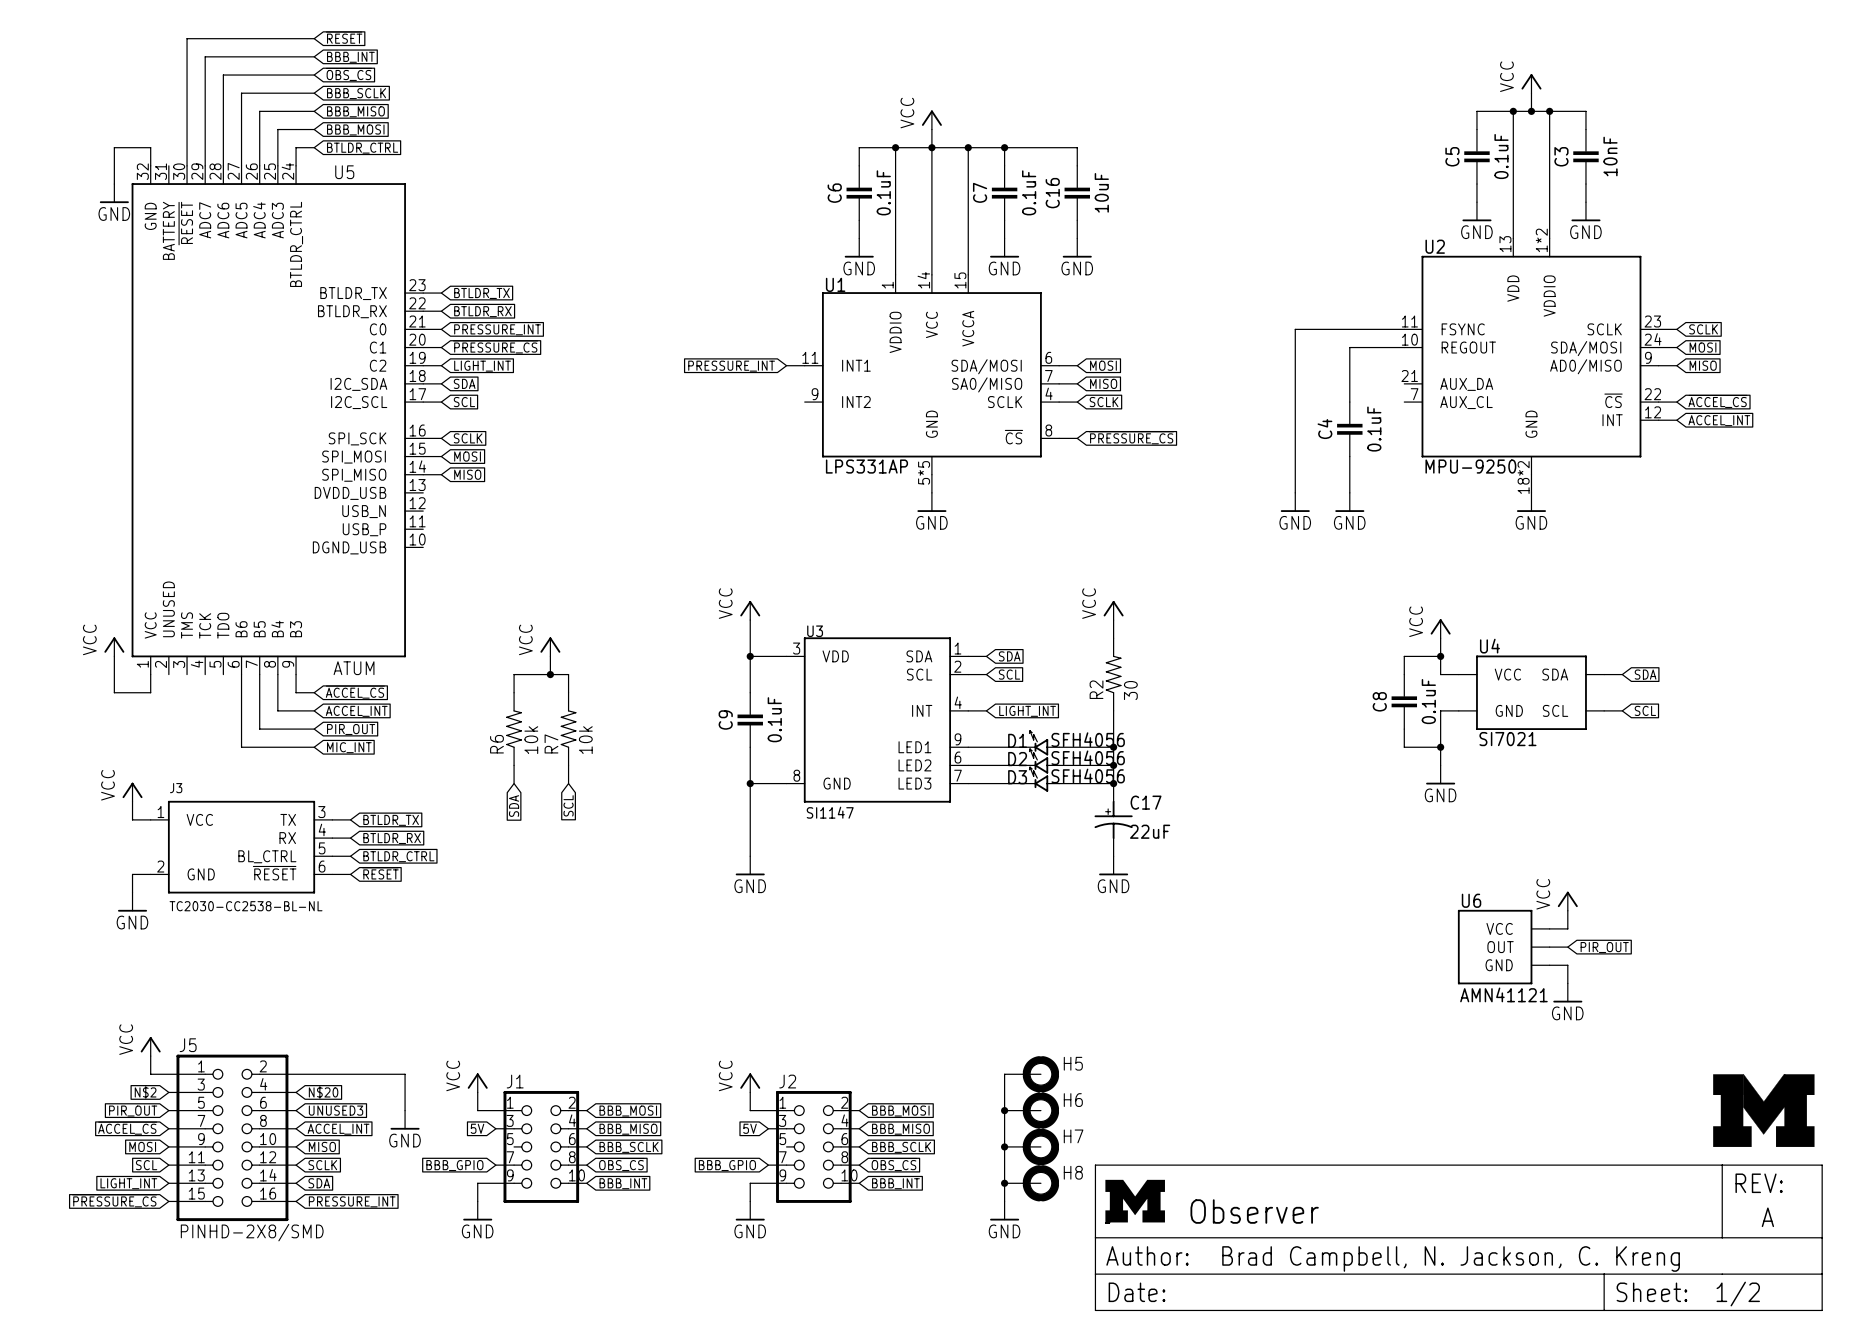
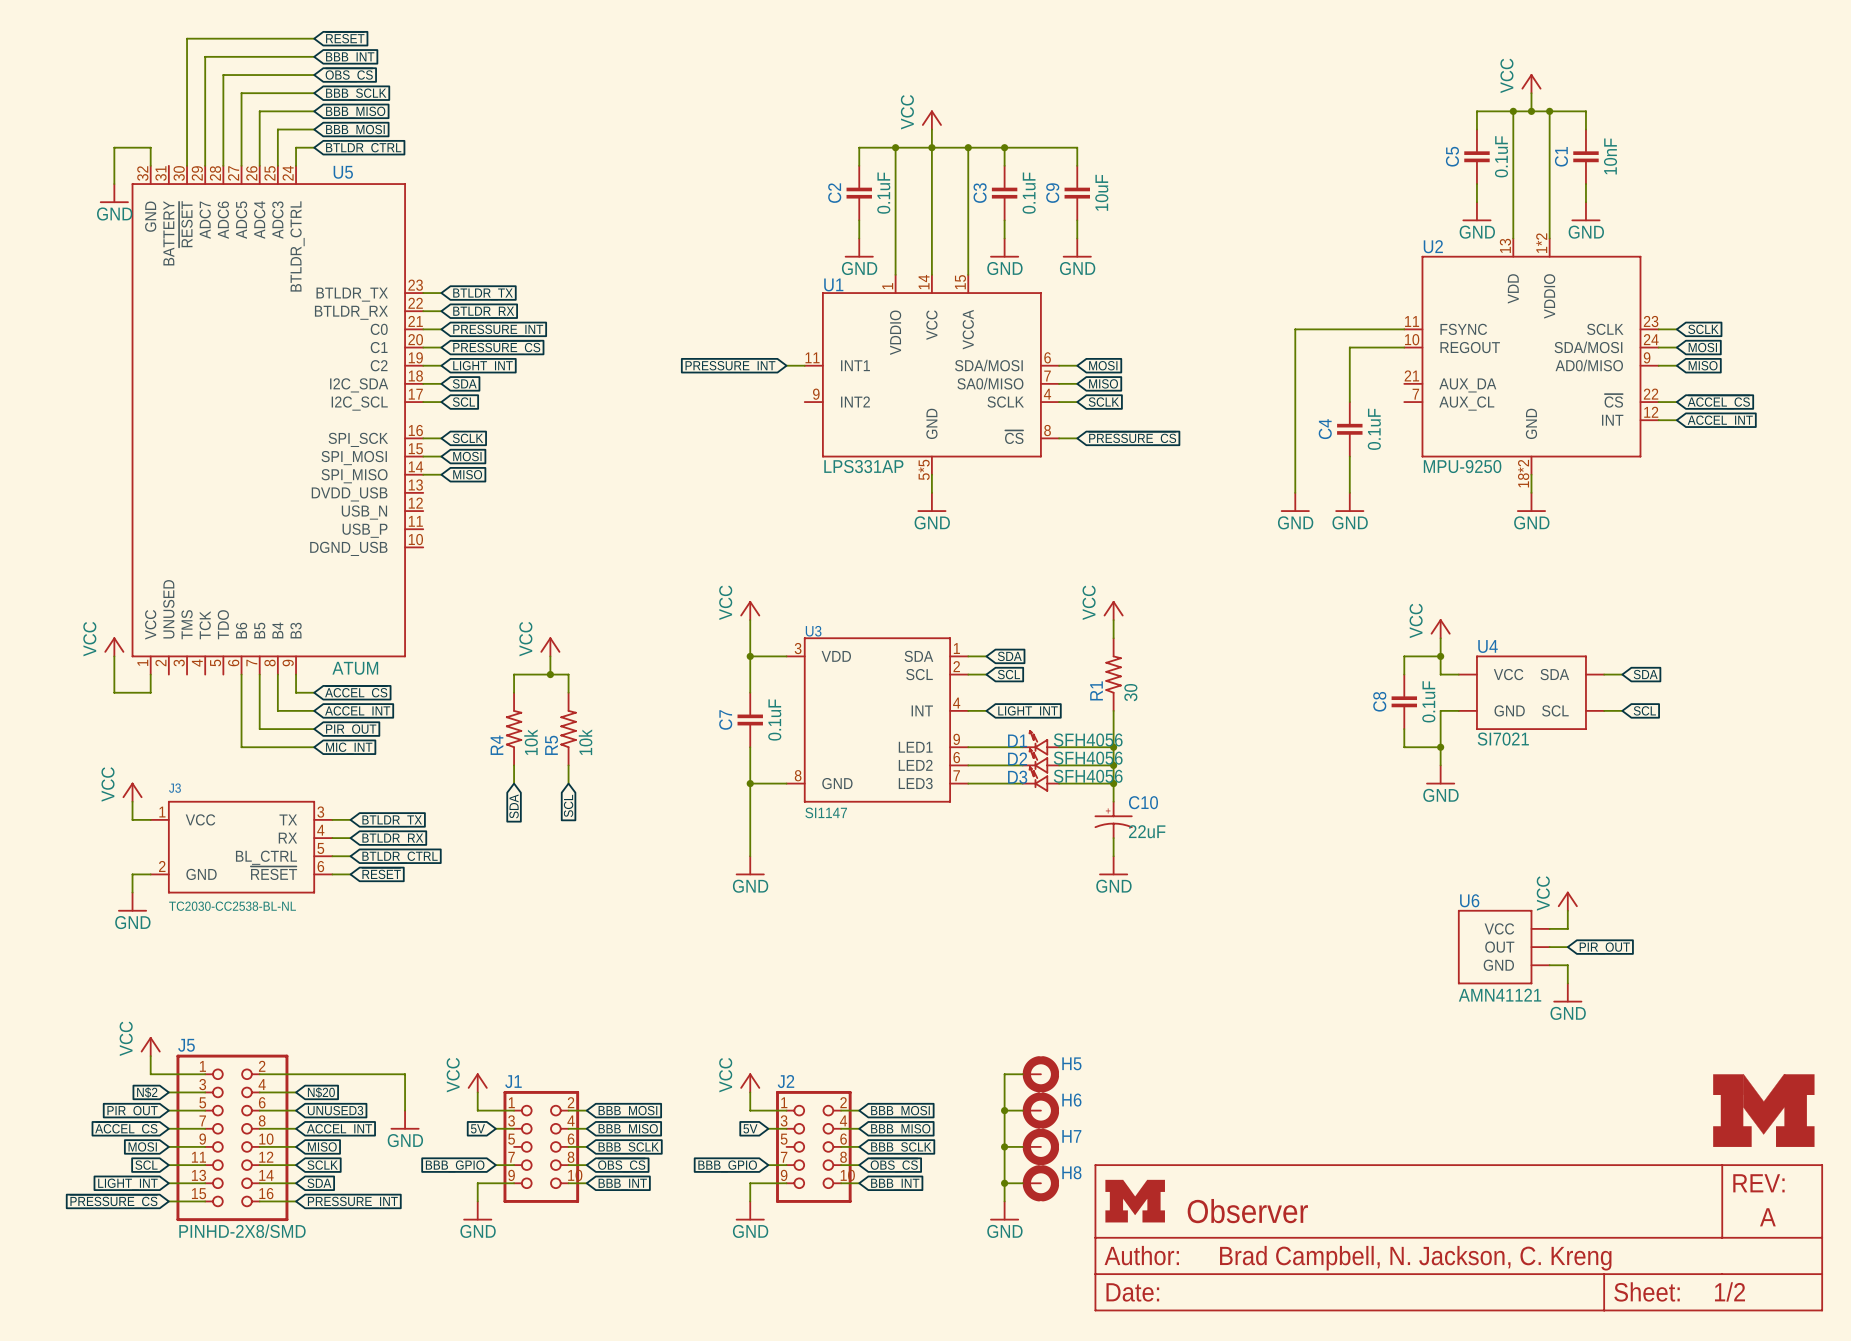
C3 name: C3 (1561, 156) -> C1 (1561, 156)
C7 name: C7 (980, 192) -> C3 (980, 193)
C6 name: C6 (834, 193) -> C2 (834, 193)
C16 name: C16 (1052, 193) -> C9 (1052, 193)
R2 name: R2 (1096, 689) -> R1 (1096, 690)
C9 name: C9 (725, 719) -> C7 (725, 719)
R7 name: R7 (551, 743) -> R5 (551, 745)
R6 name: R6 (496, 744) -> R4 (496, 745)
C17 name: C17 (1146, 802) -> C10 (1143, 802)

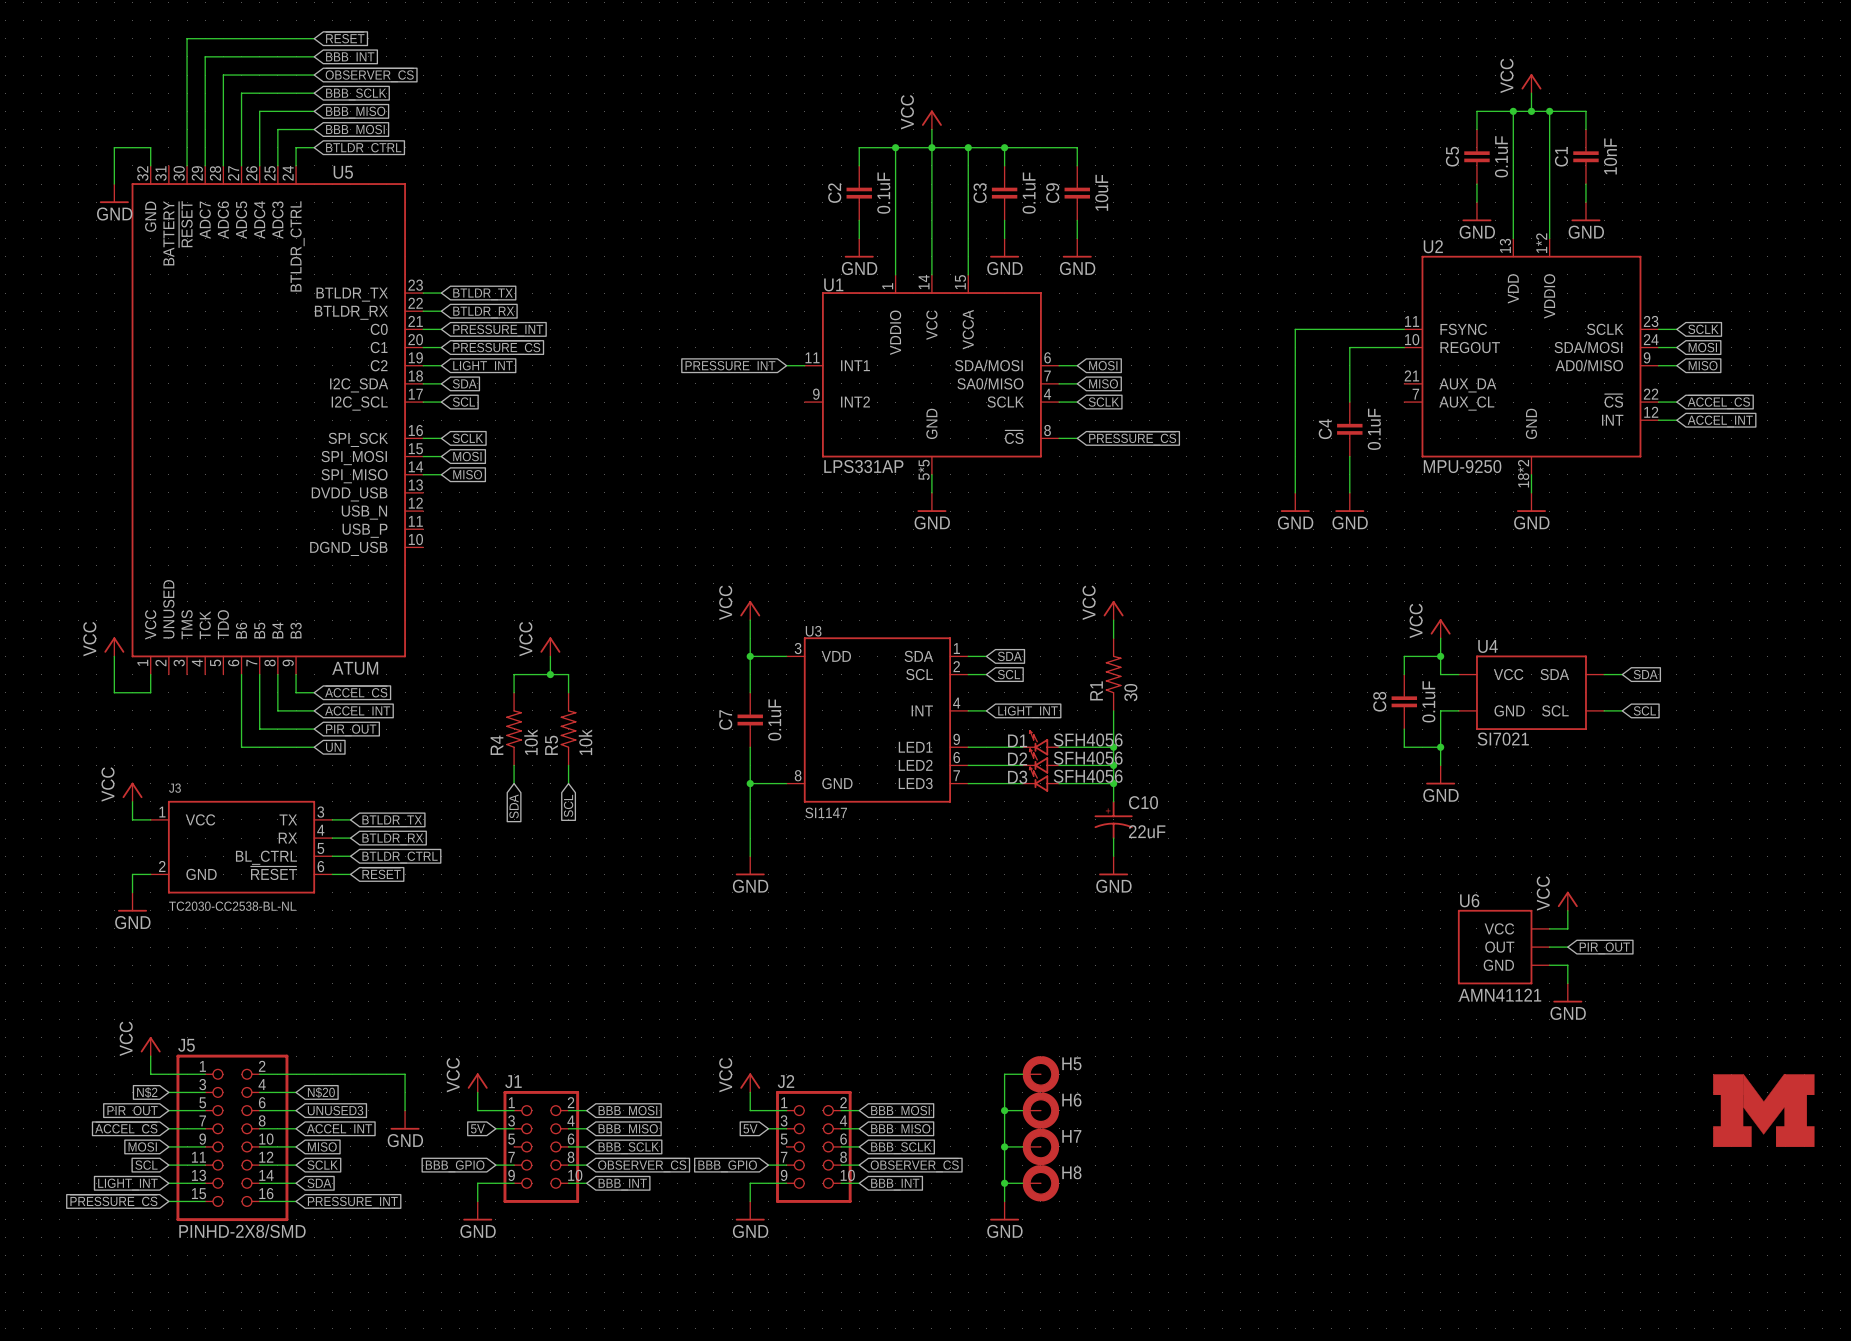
global label: ~{OBS_CS} (349, 75) -> ~{OBSERVER_CS} (369, 75)
global label: MIC_INT (349, 748) -> UN (333, 747)
global label: ~{OBS_CS} (621, 1165) -> ~{OBSERVER_CS} (642, 1165)
global label: ~{OBS_CS} (894, 1165) -> ~{OBSERVER_CS} (914, 1165)
part: (1458, 1237) -> none

